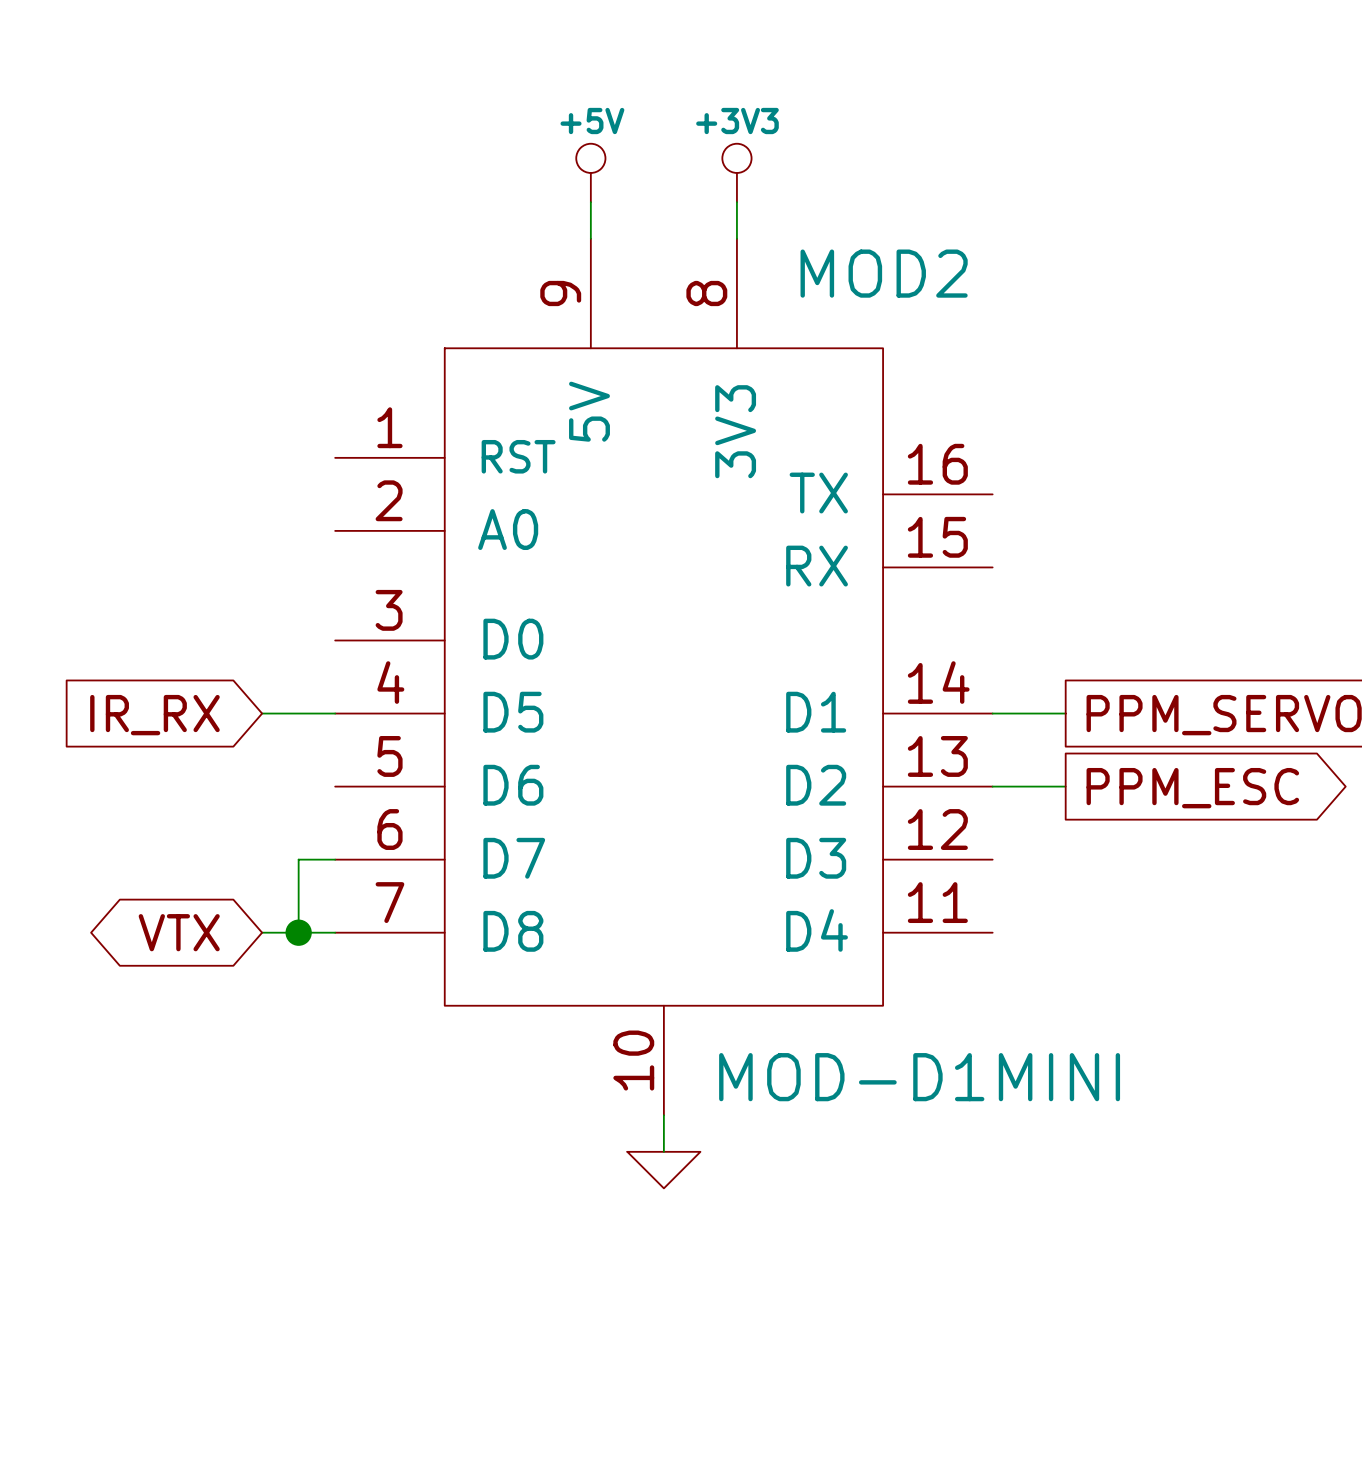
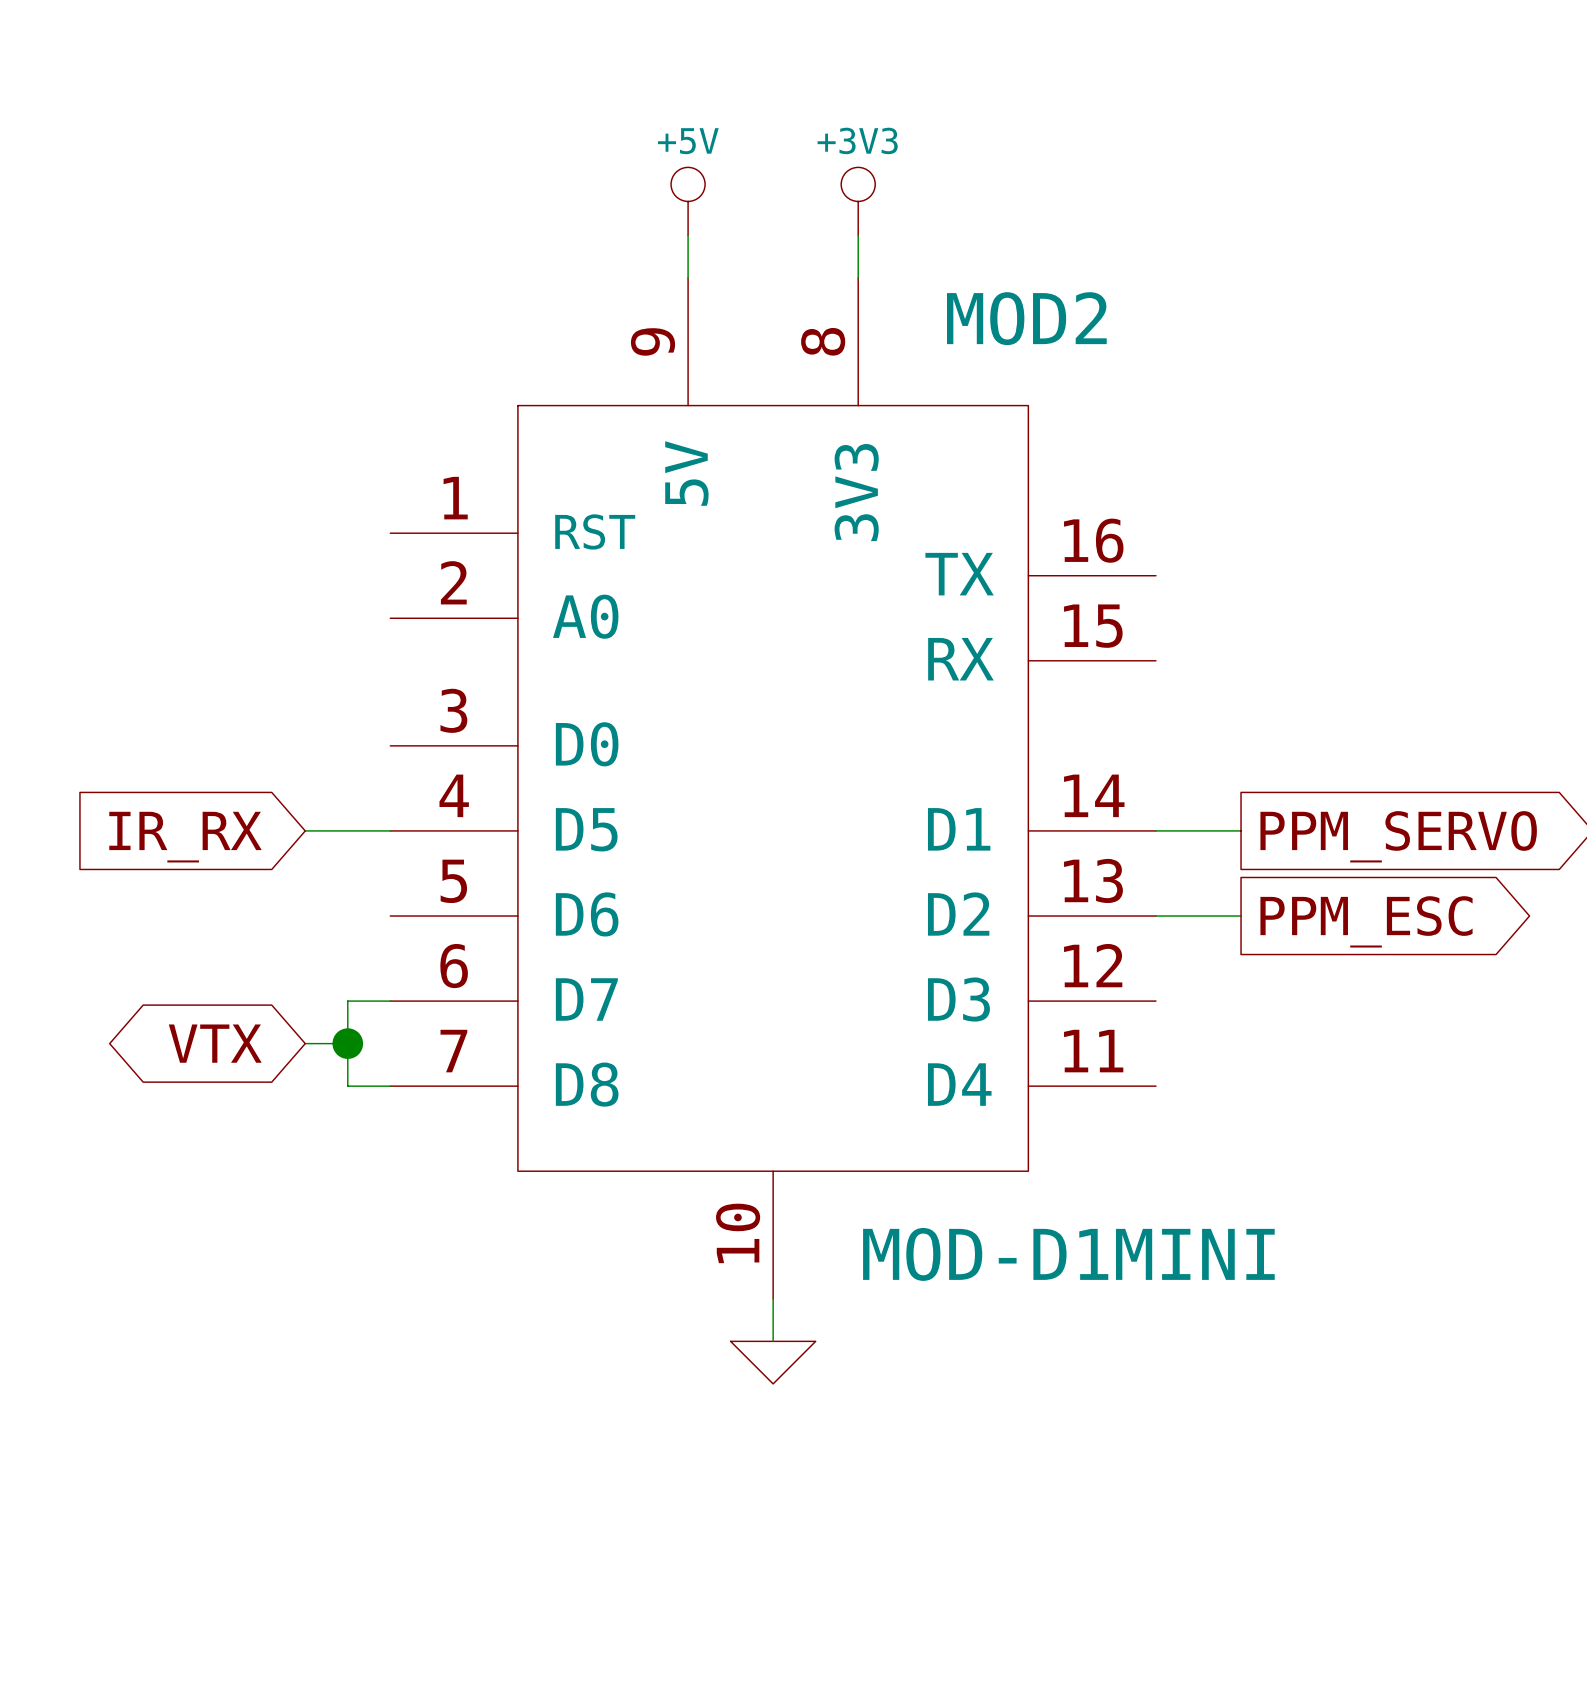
global label position: VTX (179, 932) -> VTX (215, 1043)
wire: (262, 932) (298, 932) -> (305, 1043) (347, 1043)
junction position: (298, 932) -> (347, 1043)

